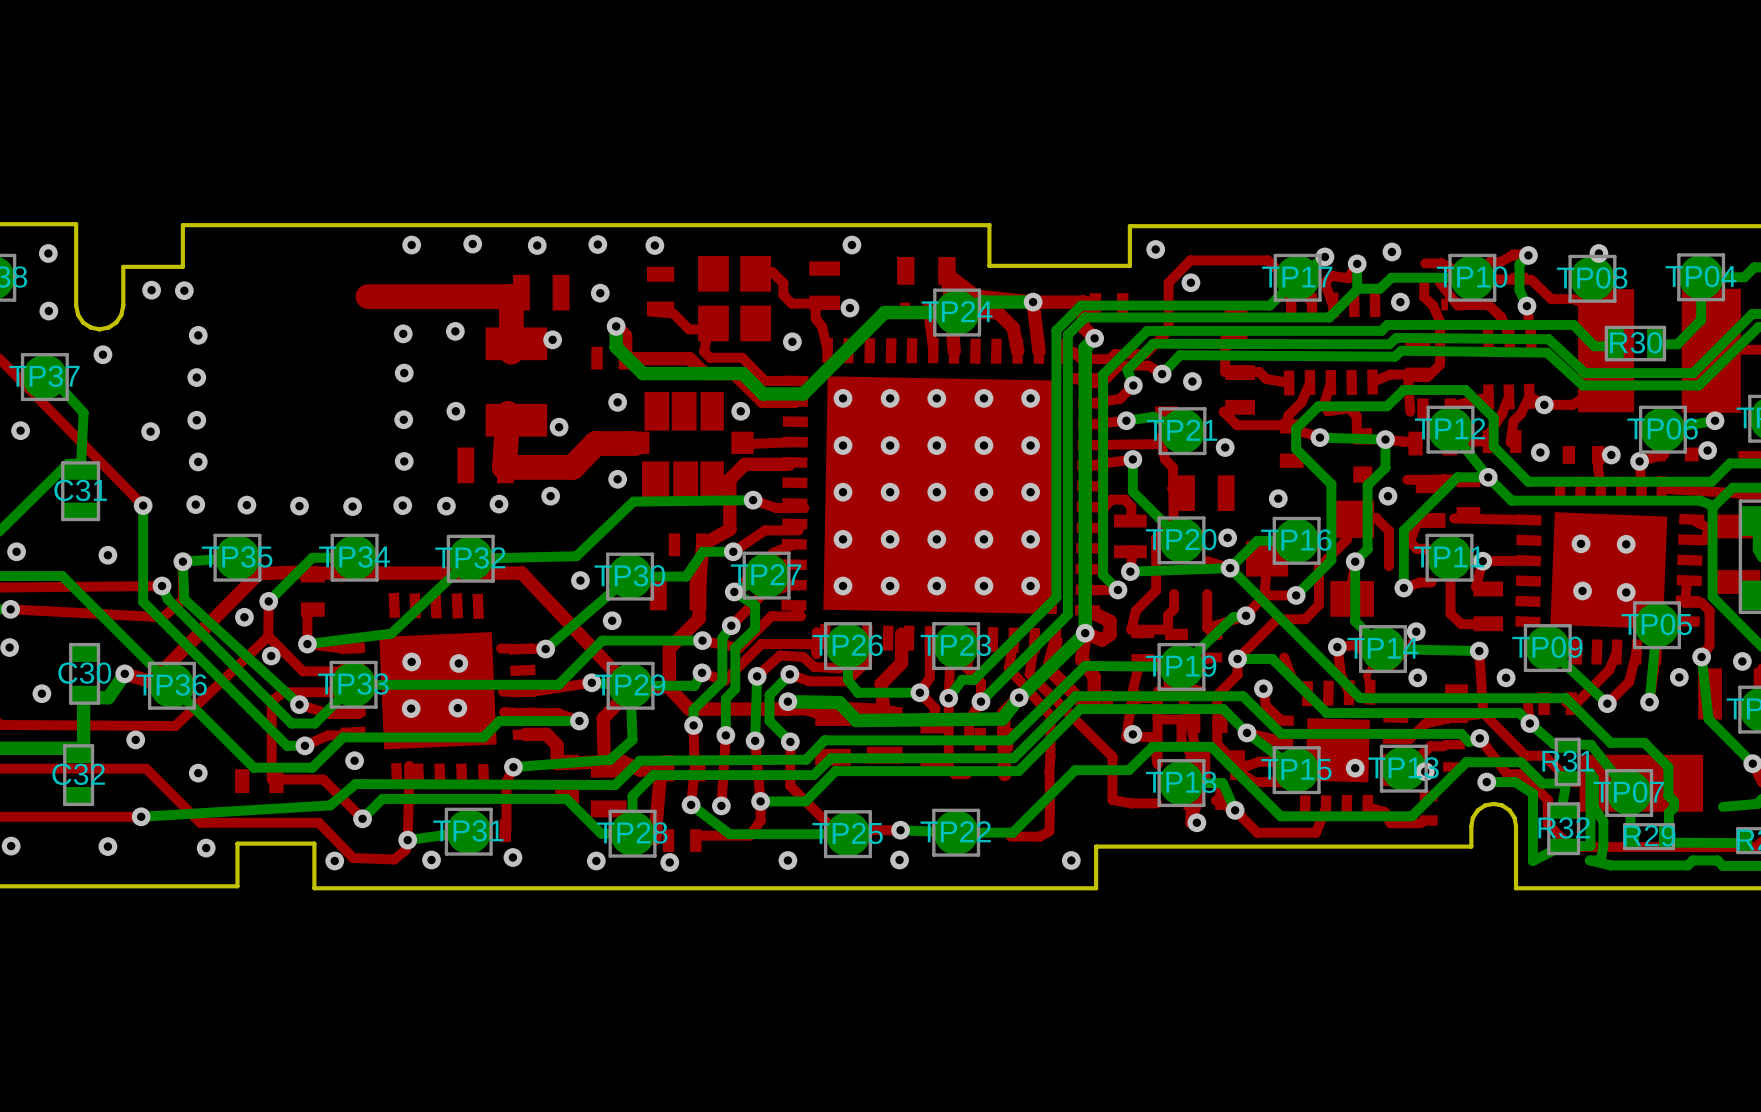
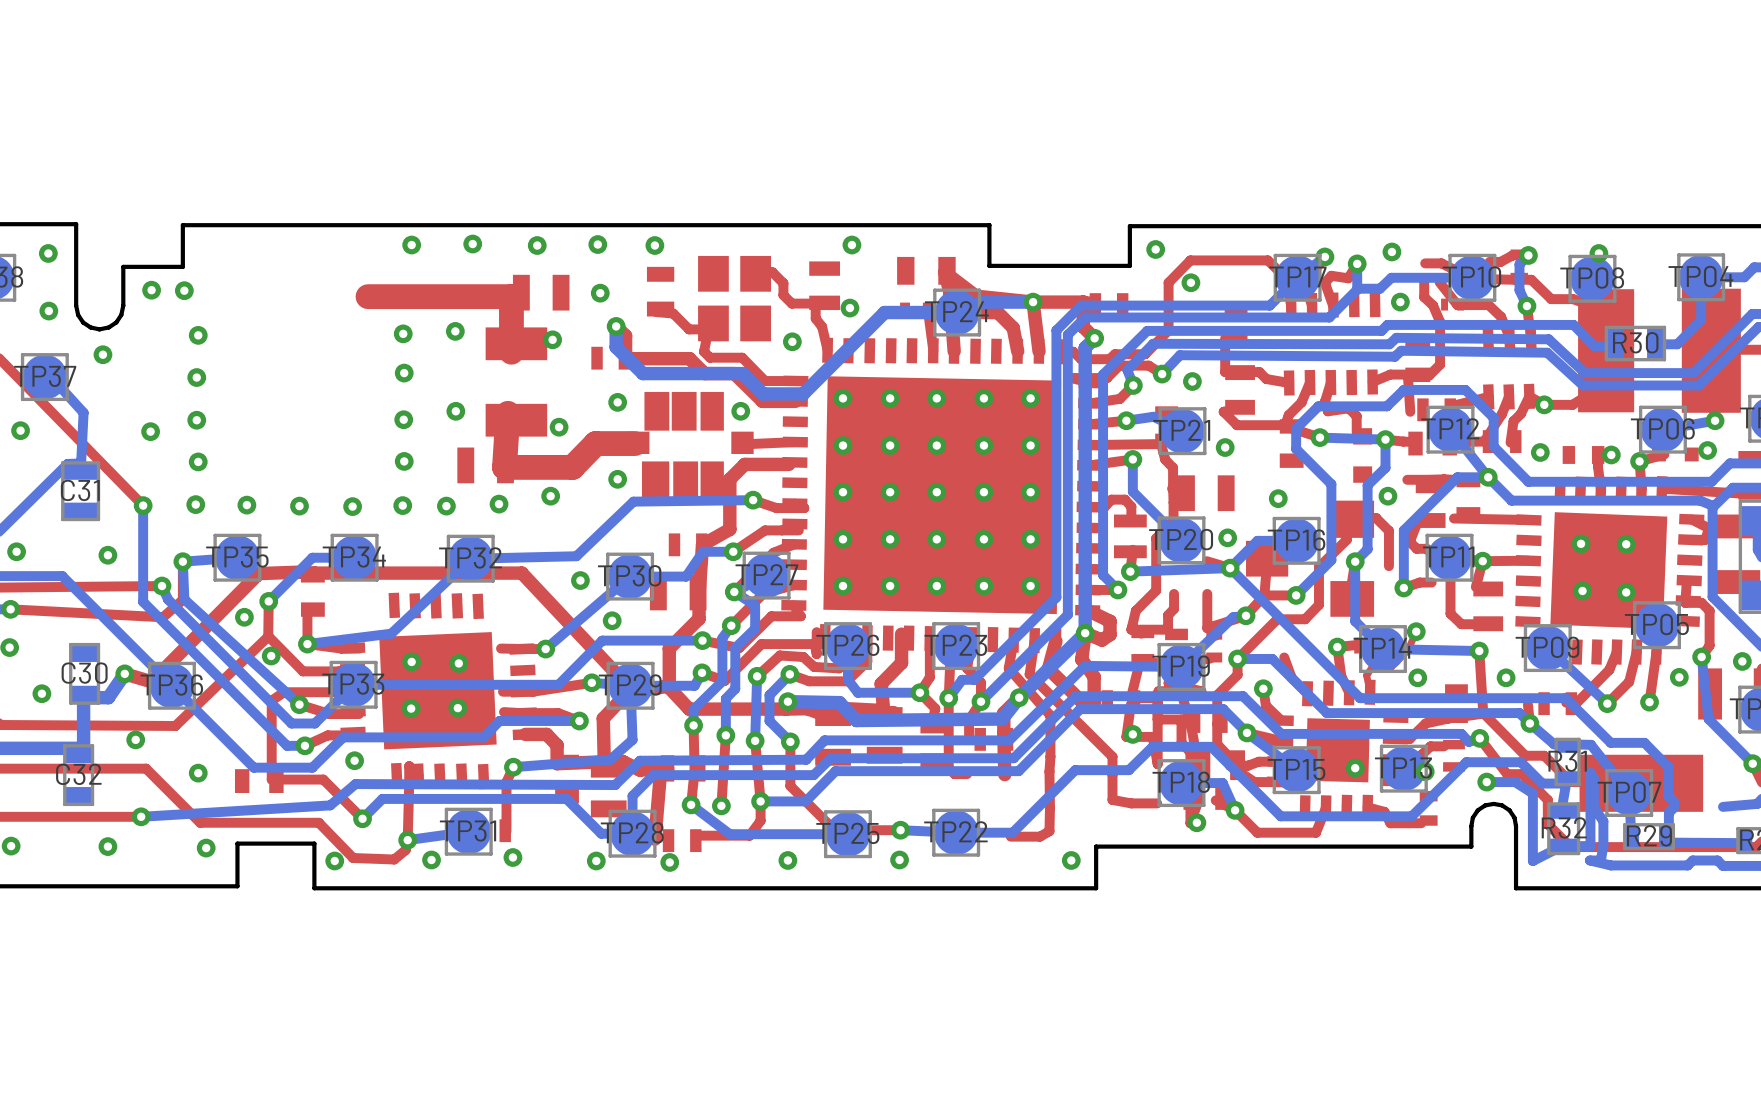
bottom track: (1656, 625) (1649, 702) -> none

